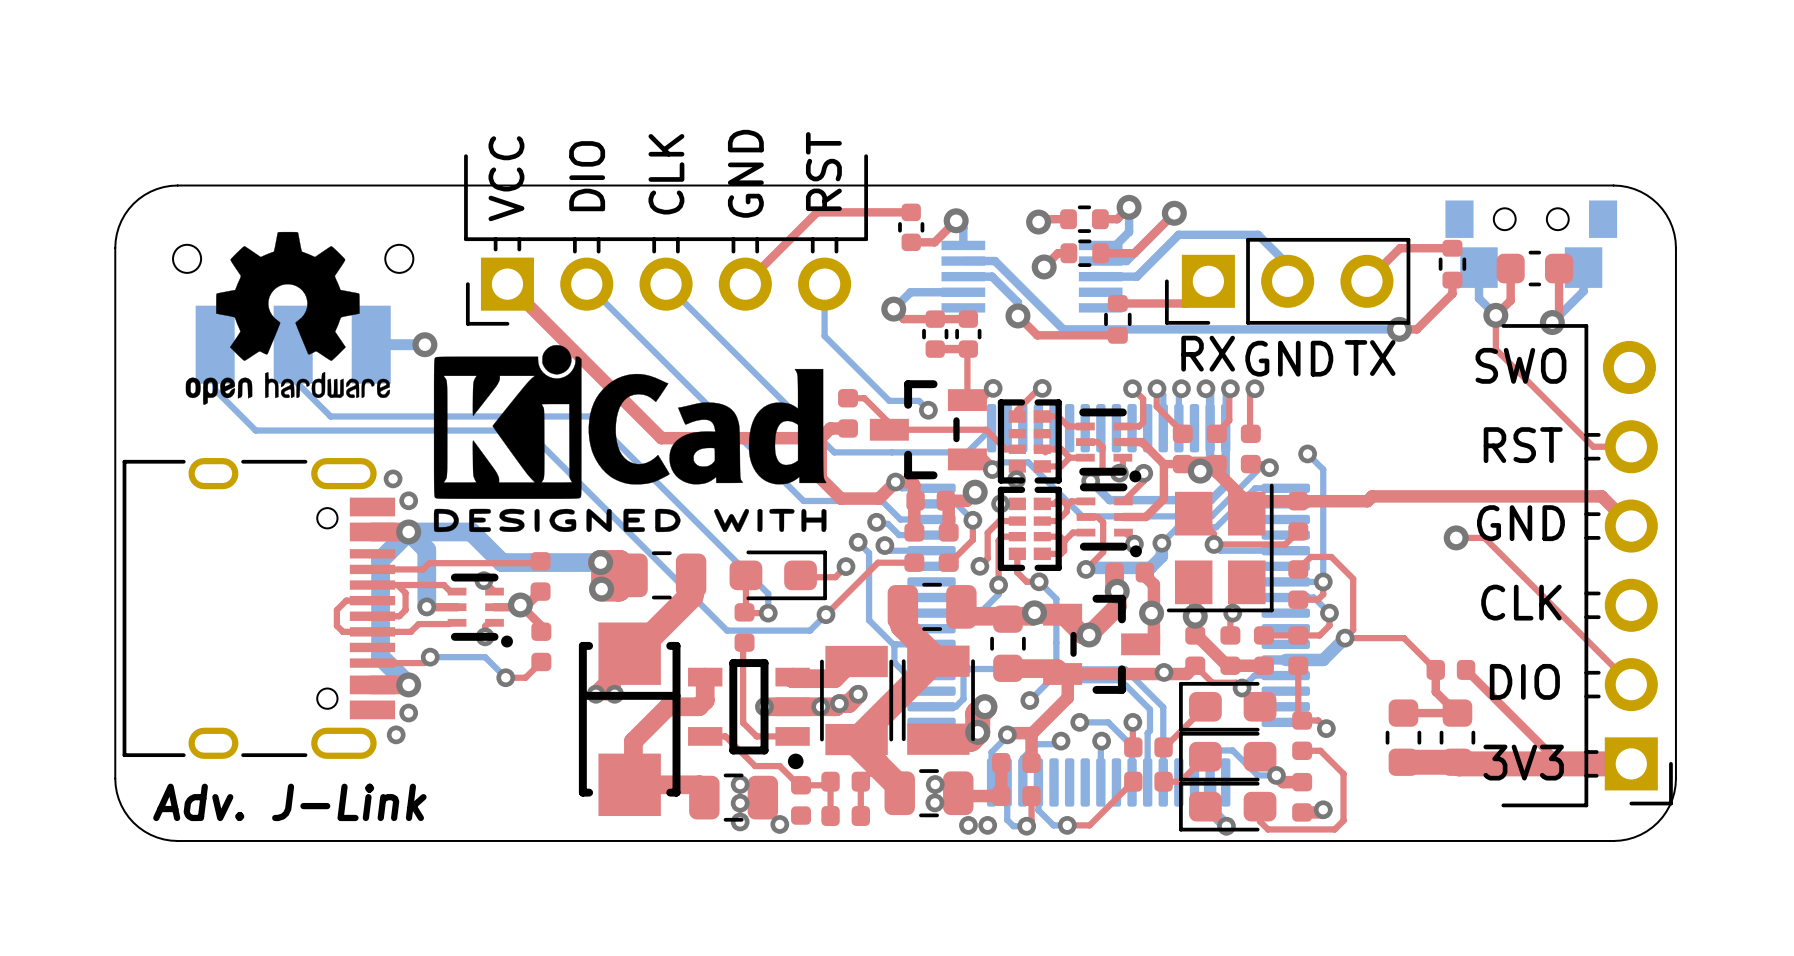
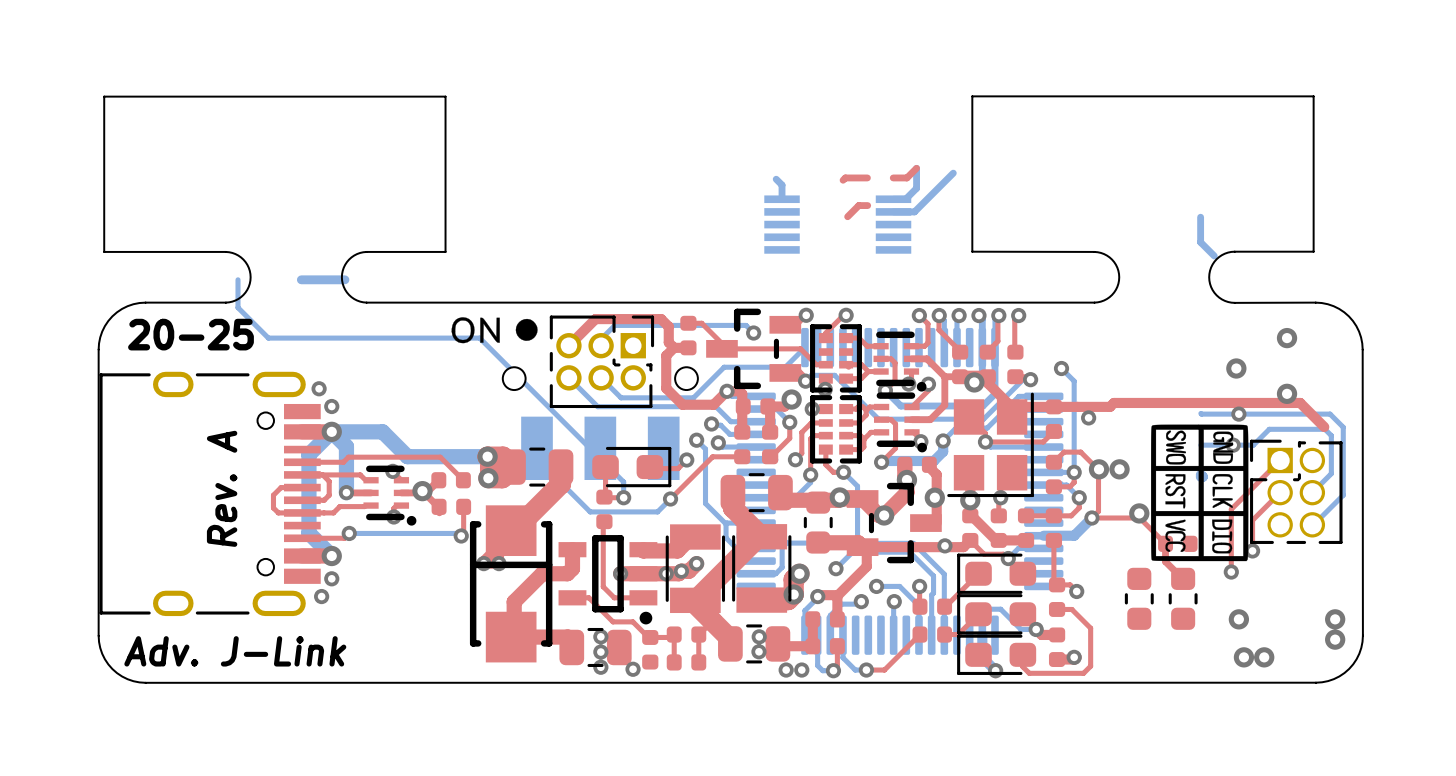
board edge: (177, 185) (1613, 185) (1634, 189) (1646, 195) (1662, 209) (1672, 227) (1675, 240) (1675, 778) (1672, 799) (1666, 811) (1652, 827) (1634, 837) (1613, 840) (177, 840) (157, 837) (144, 831) (128, 817) (118, 799) (115, 785) (115, 247) (116, 234) (121, 220) (133, 203) (150, 191) (163, 187) (177, 185) -> (972, 96) (972, 251) (1100, 252) (1112, 259) (1119, 274) (1117, 286) (1106, 299) (1094, 302) (363, 302) (351, 297) (342, 283) (343, 267) (354, 255) (366, 251) (445, 251) (445, 96) (104, 96) (104, 251) (229, 252) (243, 259) (248, 267) (250, 277) (245, 292) (235, 300) (225, 302) (133, 304) (117, 312) (108, 320) (102, 331) (98, 349) (98, 635) (100, 647) (104, 659) (112, 669) (122, 676) (133, 681) (145, 682) (1315, 682) (1328, 681) (1339, 676) (1349, 668) (1356, 659) (1361, 647) (1362, 635) (1362, 349) (1361, 337) (1356, 326) (1348, 316) (1333, 306) (1315, 302) (1228, 302) (1214, 292) (1209, 277) (1214, 261) (1228, 252) (1313, 251) (1313, 96) (972, 96)
via: (1129, 207) -> none
top track: (911, 212) (817, 212) (745, 284) -> none
top track: (1174, 213) (1134, 253) (1100, 253) -> none
via: (1174, 213) -> none
part: (1084, 219) -> none
top track: (956, 220) (934, 242) (911, 242) -> none
via: (956, 220) -> none
via: (1038, 222) -> none
part: (911, 227) -> none
drawing: [185, 231, 390, 405] -> none
part: (666, 239) -> none
part: (1531, 244) -> none
top track: (1452, 248) (1400, 248) (1366, 281) -> none
part: (1084, 253) -> none
bottom track: (963, 261) (994, 261) (1063, 329) (1399, 329) -> none
part: (1452, 264) -> none
via: (1044, 266) -> none
bottom track: (1583, 267) (1583, 291) (1552, 322) -> none
top track: (1510, 268) (1510, 300) (1495, 315) (1495, 349) (1593, 446) (1631, 446) -> none
part: (1534, 268) -> none
top track: (1559, 268) (1559, 315) (1552, 322) -> none
bottom track: (963, 276) (992, 276) (1017, 302) (1017, 315) -> none
bottom track: (1100, 276) (1136, 276) (1178, 234) (1258, 234) (1287, 264) (1287, 281) -> none
top track: (1452, 280) (1452, 293) (1416, 329) (1399, 329) -> none
top track: (1208, 281) (1186, 303) (1117, 303) -> none
part: (1287, 281) -> none
top track: (507, 284) (661, 438) (820, 438) -> none
bottom track: (586, 284) (803, 500) -> (568, 377) (597, 406) (652, 406)
bottom track: (666, 284) (834, 452) (892, 452) -> (601, 377) (621, 397) (693, 397) (724, 367)
bottom track: (824, 284) (824, 336) (889, 400) -> (601, 345) (601, 339) (614, 325) (721, 325)
bottom track: (963, 292) (910, 292) (893, 309) -> none
top track: (893, 309) (903, 319) (968, 319) -> none
via: (893, 309) -> none
part position: (293, 314) -> (600, 423)
top track: (1017, 315) (1037, 335) (1117, 335) -> none
via: (1017, 315) -> none
via: (1495, 315) -> none
part: (1117, 319) -> none
via: (1552, 322) -> none
via: (1399, 329) -> none
part: (935, 334) -> none
part: (968, 334) -> none
bottom track: (215, 344) (215, 389) (255, 430) (526, 430) (660, 563) -> none
via: (424, 344) -> none
drawing: [433, 345, 827, 533] -> none
top track: (935, 349) (968, 349) (967, 400) -> none
text: RX (1208, 353) -> none
text: GND (1289, 358) -> none
text: TX (1370, 358) -> none
drawing: none -> [451, 317, 538, 344]
text: none -> 20-25 (190, 334)
via: none -> (1287, 338)
top track: none -> (568, 345) (595, 319) (661, 319) (668, 326) (668, 342) (674, 347)
part: none -> (601, 361)
via: none -> (1236, 368)
via: none -> (1287, 393)
bottom track: none -> (1200, 413) (1330, 414) (1343, 427) (1343, 495) (1312, 524)
via: none -> (1238, 414)
via: none -> (1088, 417)
drawing: none -> [1150, 424, 1249, 562]
top track: (1456, 537) (1484, 537) (1631, 684) -> none
via: (1456, 537) -> none
bottom track: none -> (1200, 445) (1253, 445) (1269, 429) (1325, 429) (1331, 435) (1331, 473) (1312, 492)
via: none -> (1233, 445)
top track: none -> (440, 457) (463, 480)
part: (1587, 565) -> none
top track: none -> (1280, 460) (1231, 509) (1231, 572)
part rotation: 0° (540, 576) -> 90° clockwise (451, 480)
via: none -> (1099, 469)
via: none -> (1119, 469)
bottom track: none -> (1200, 474) (1202, 476) (1200, 476)
text: none -> Rev. A (222, 488)
part: none -> (1296, 491)
top track: none -> (1280, 492) (1252, 520) (1252, 550)
top track: none -> (463, 506) (463, 533) (461, 535)
via: none -> (1139, 513)
part rotation: 0° (541, 646) -> 90° clockwise (451, 506)
bottom track: (485, 657) (505, 677) -> (393, 533) (458, 533) (461, 535)
top track: (541, 661) (525, 677) (505, 677) -> none
top track: (1466, 669) (1559, 763) (1631, 763) (1459, 763) (1457, 762) (1403, 762) -> none
via position: (505, 677) -> (461, 535)
via: none -> (1252, 550)
via: none -> (1231, 572)
top track: (1403, 713) (1457, 713) -> none
via: none -> (1238, 619)
via: none -> (1335, 619)
via: none -> (1335, 639)
via: none -> (1243, 657)
via: none -> (1264, 657)

